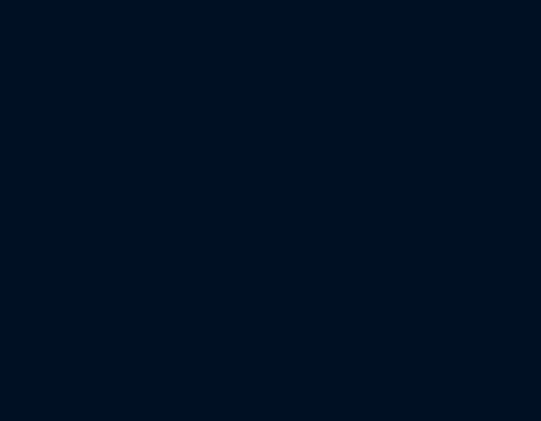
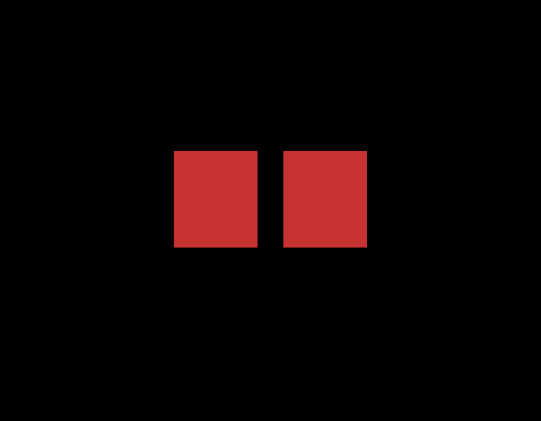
part: none -> (270, 199)

